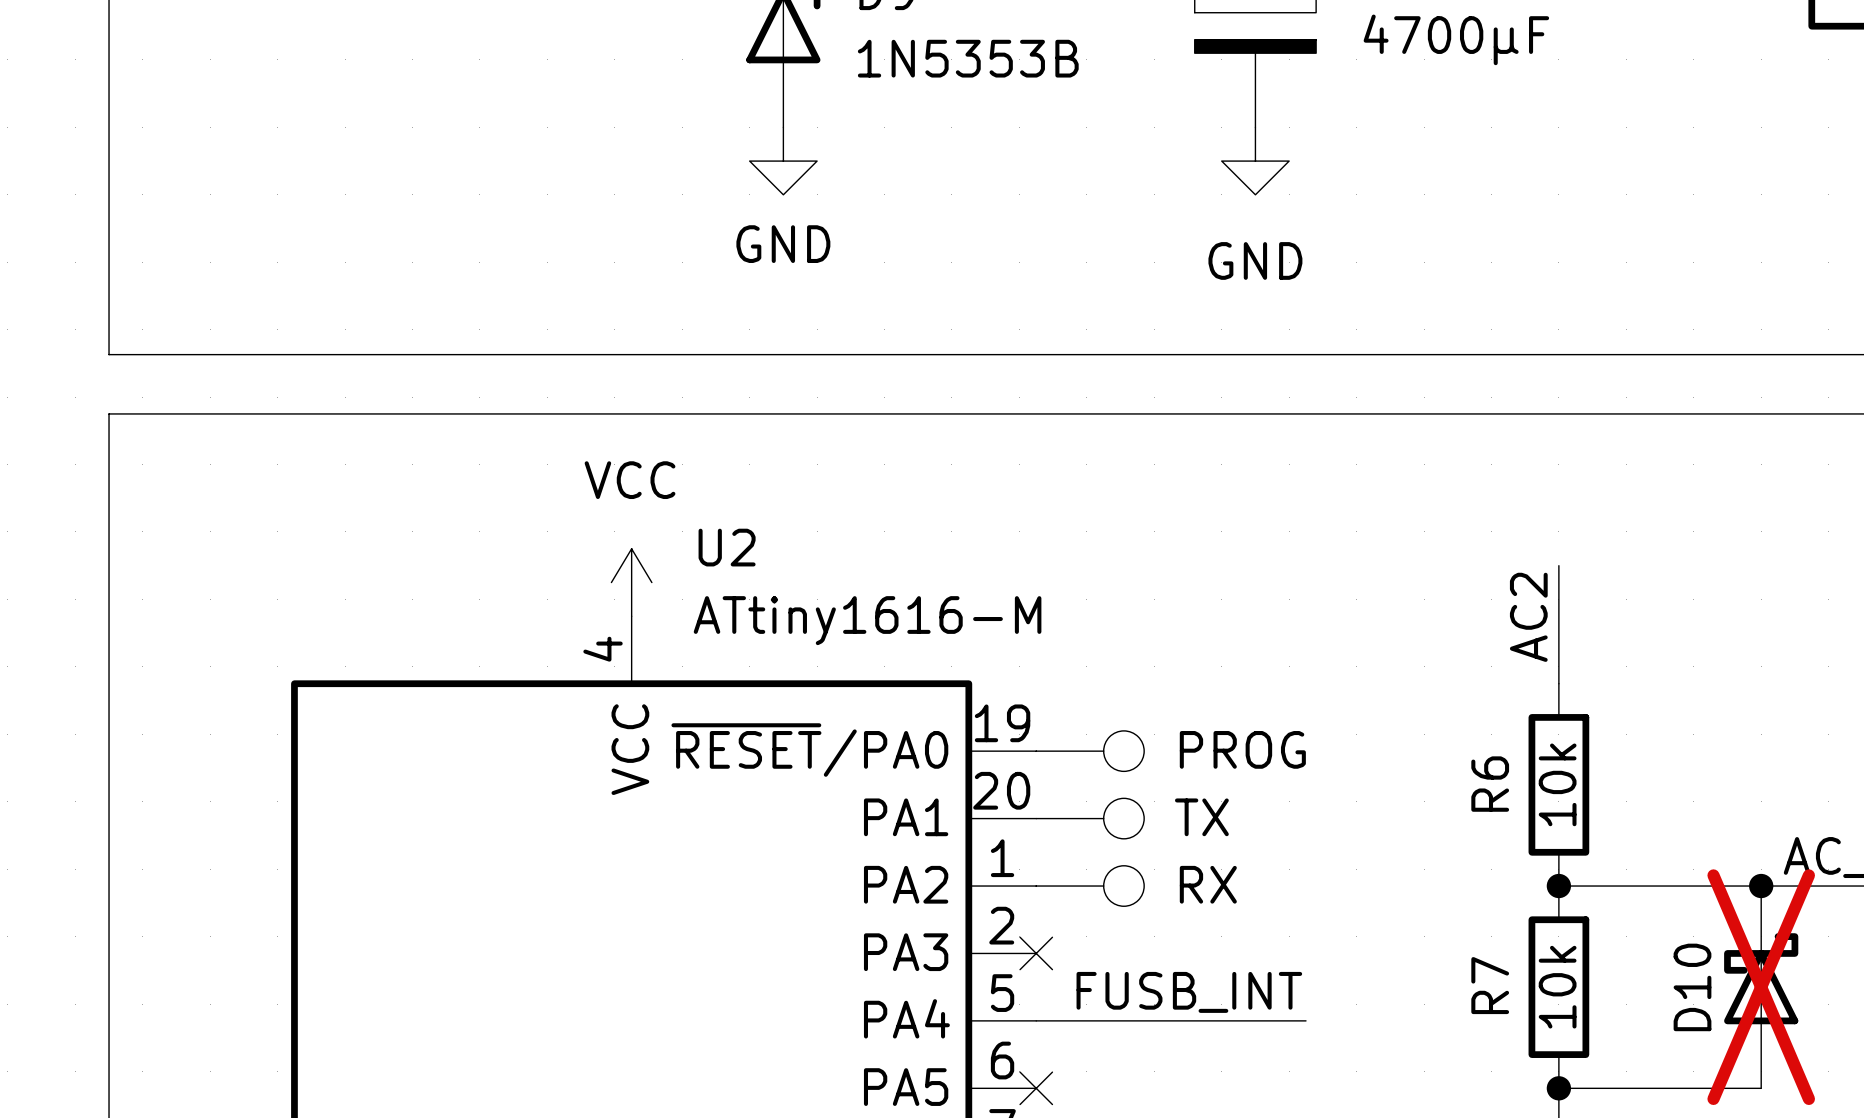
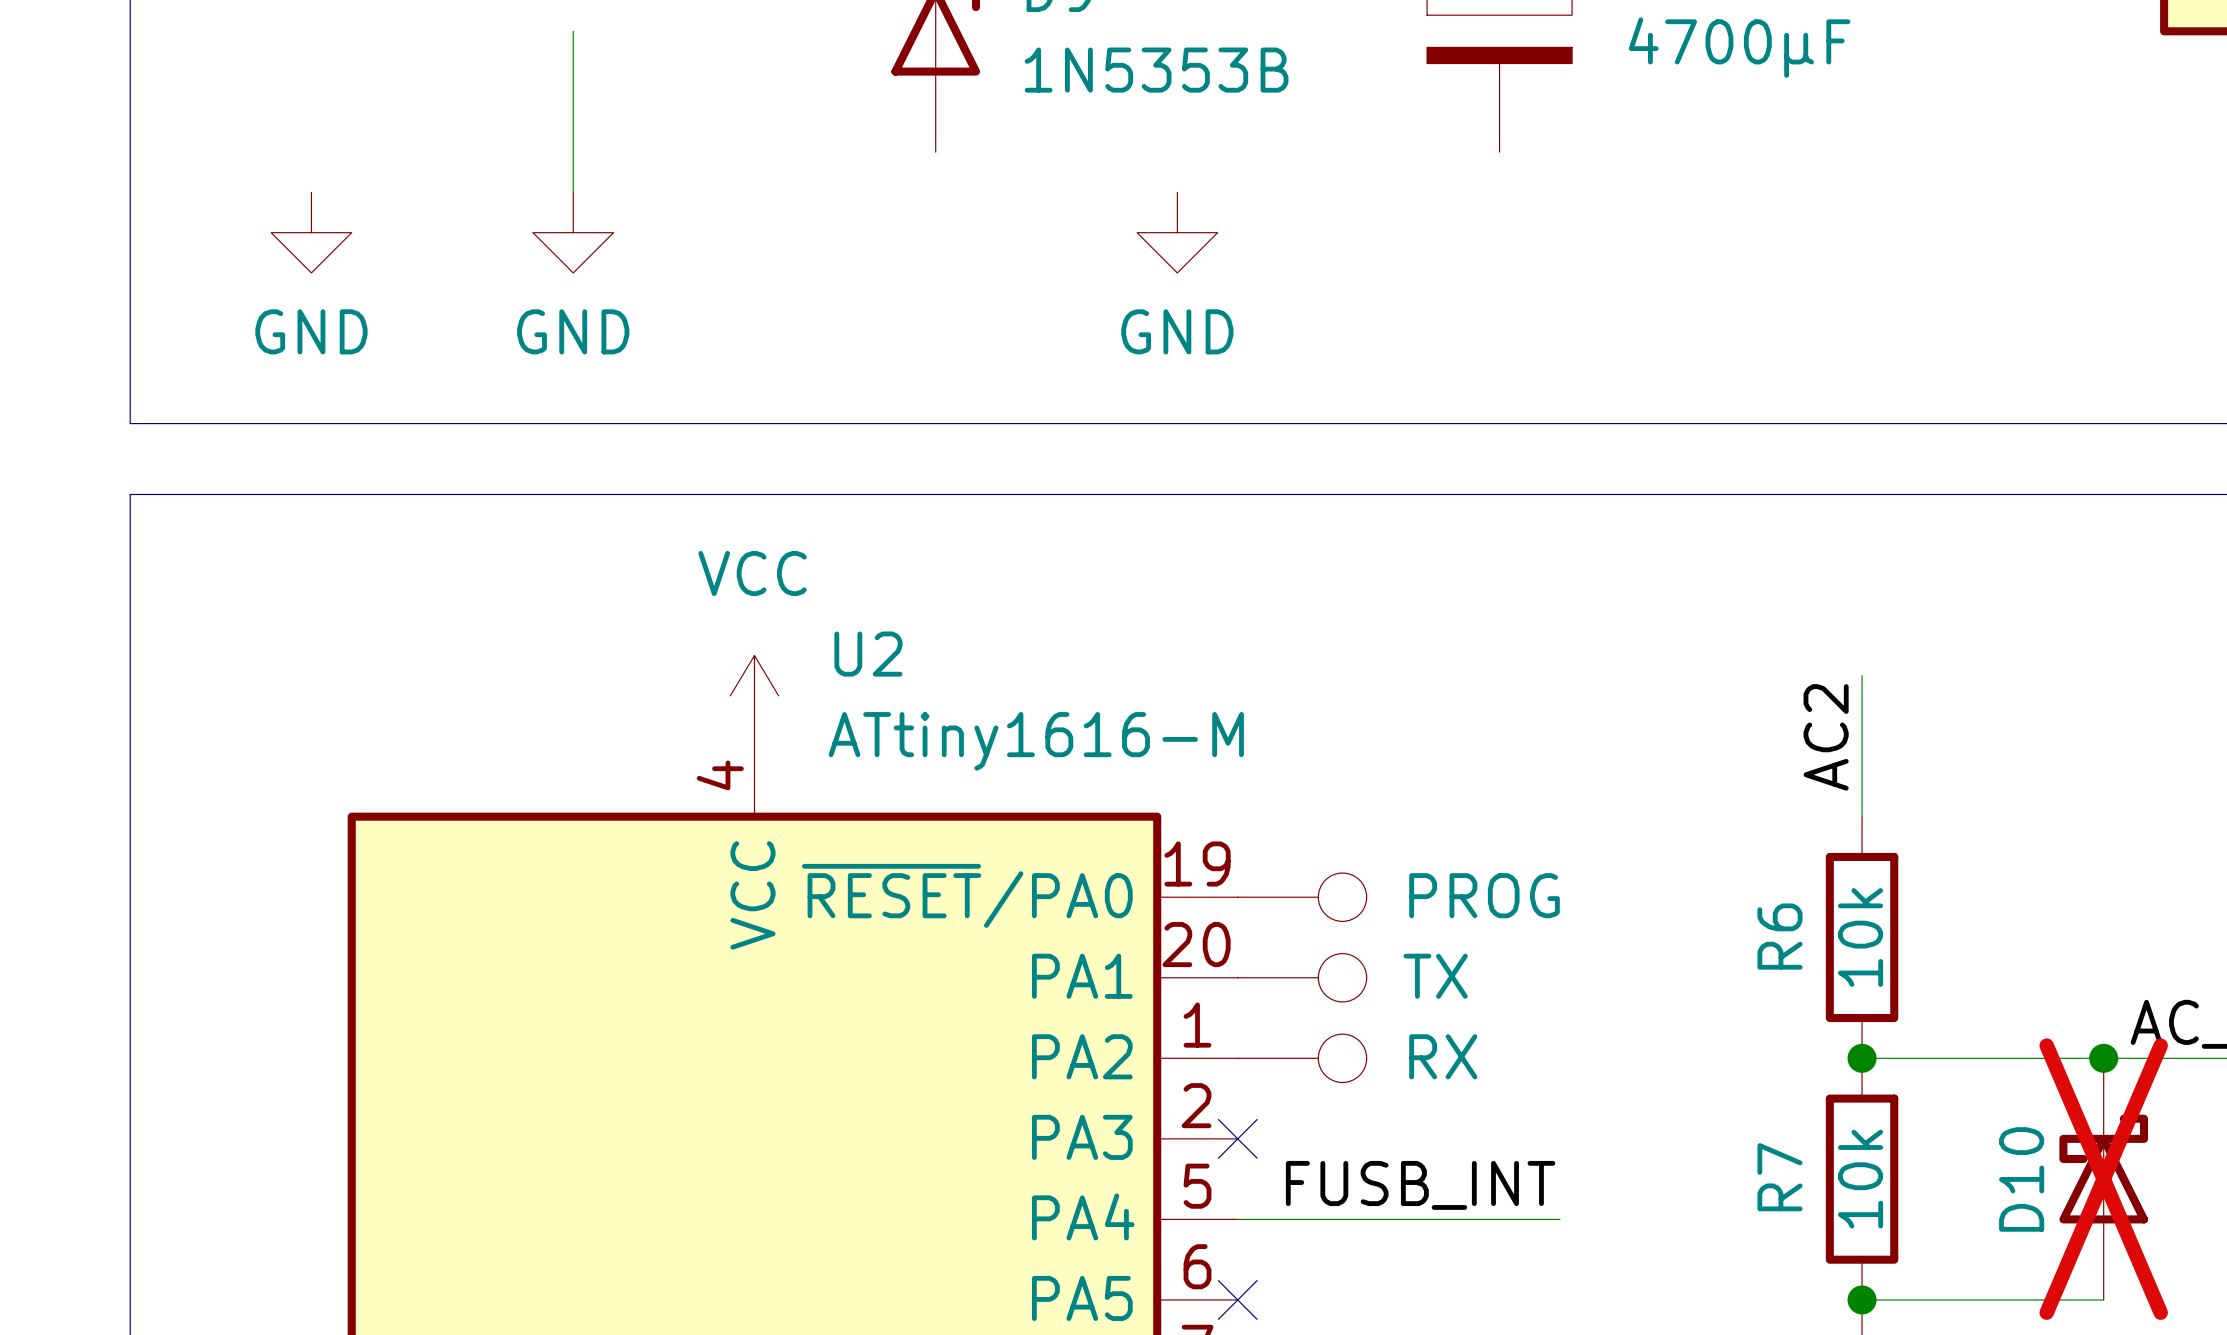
wire: none -> (573, 31) (573, 192)
power symbol: GND (783, 161) -> none
power symbol: GND (1255, 161) -> none
power symbol: none -> GND (311, 232)
power symbol: none -> GND (573, 232)
power symbol: none -> GND (1177, 232)

